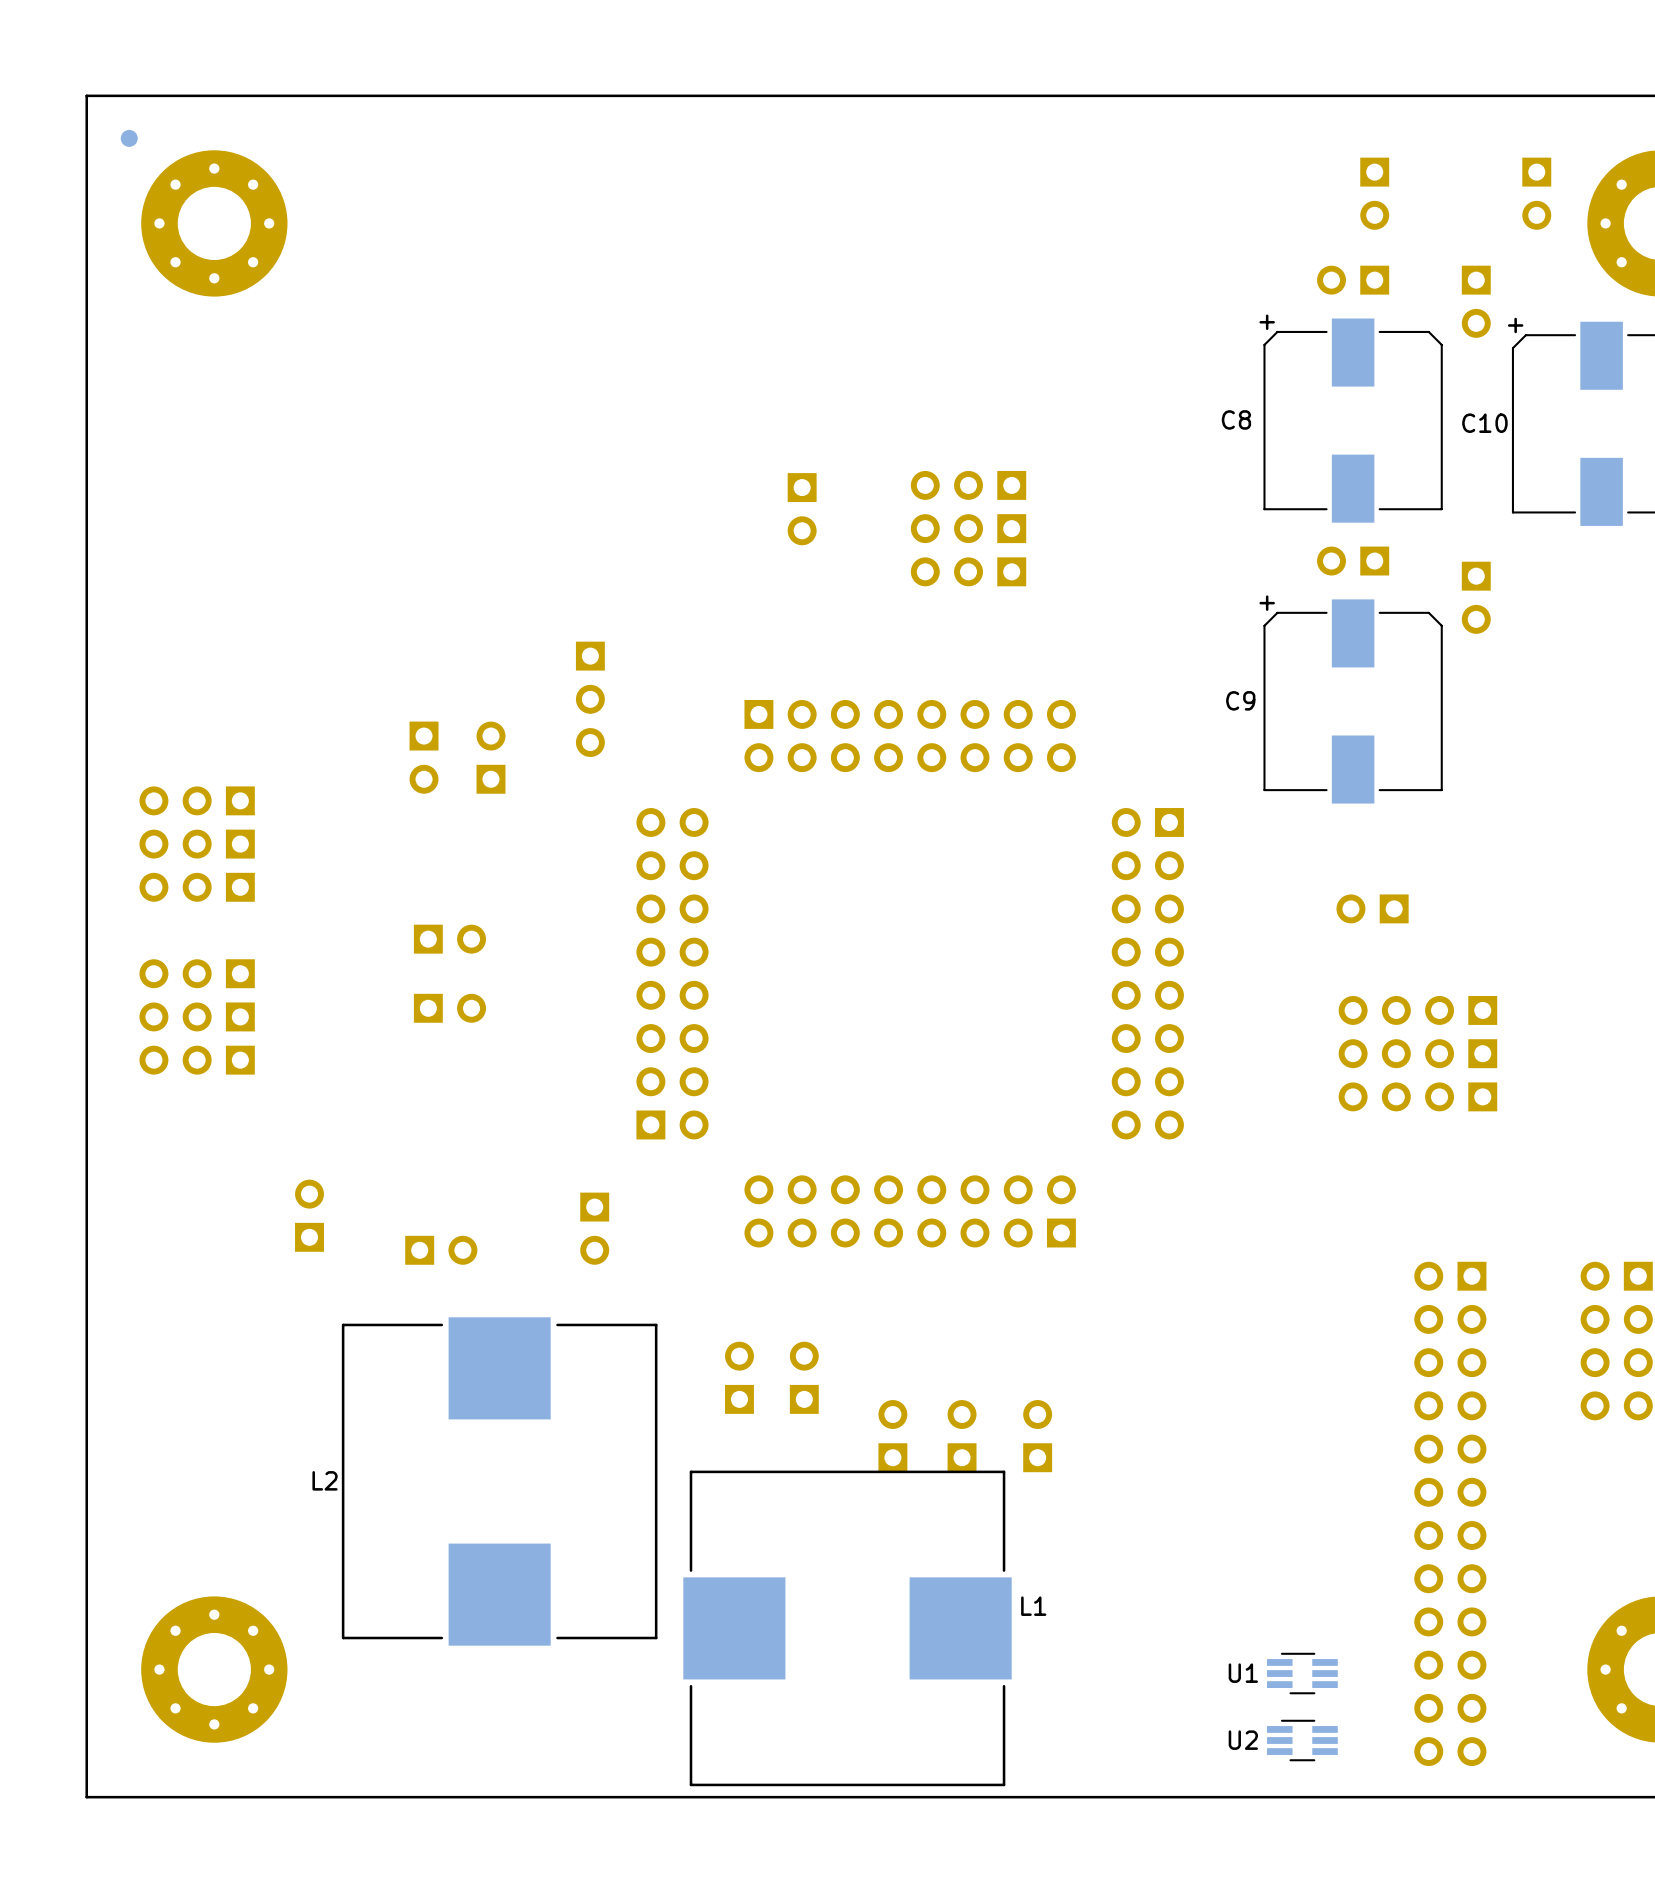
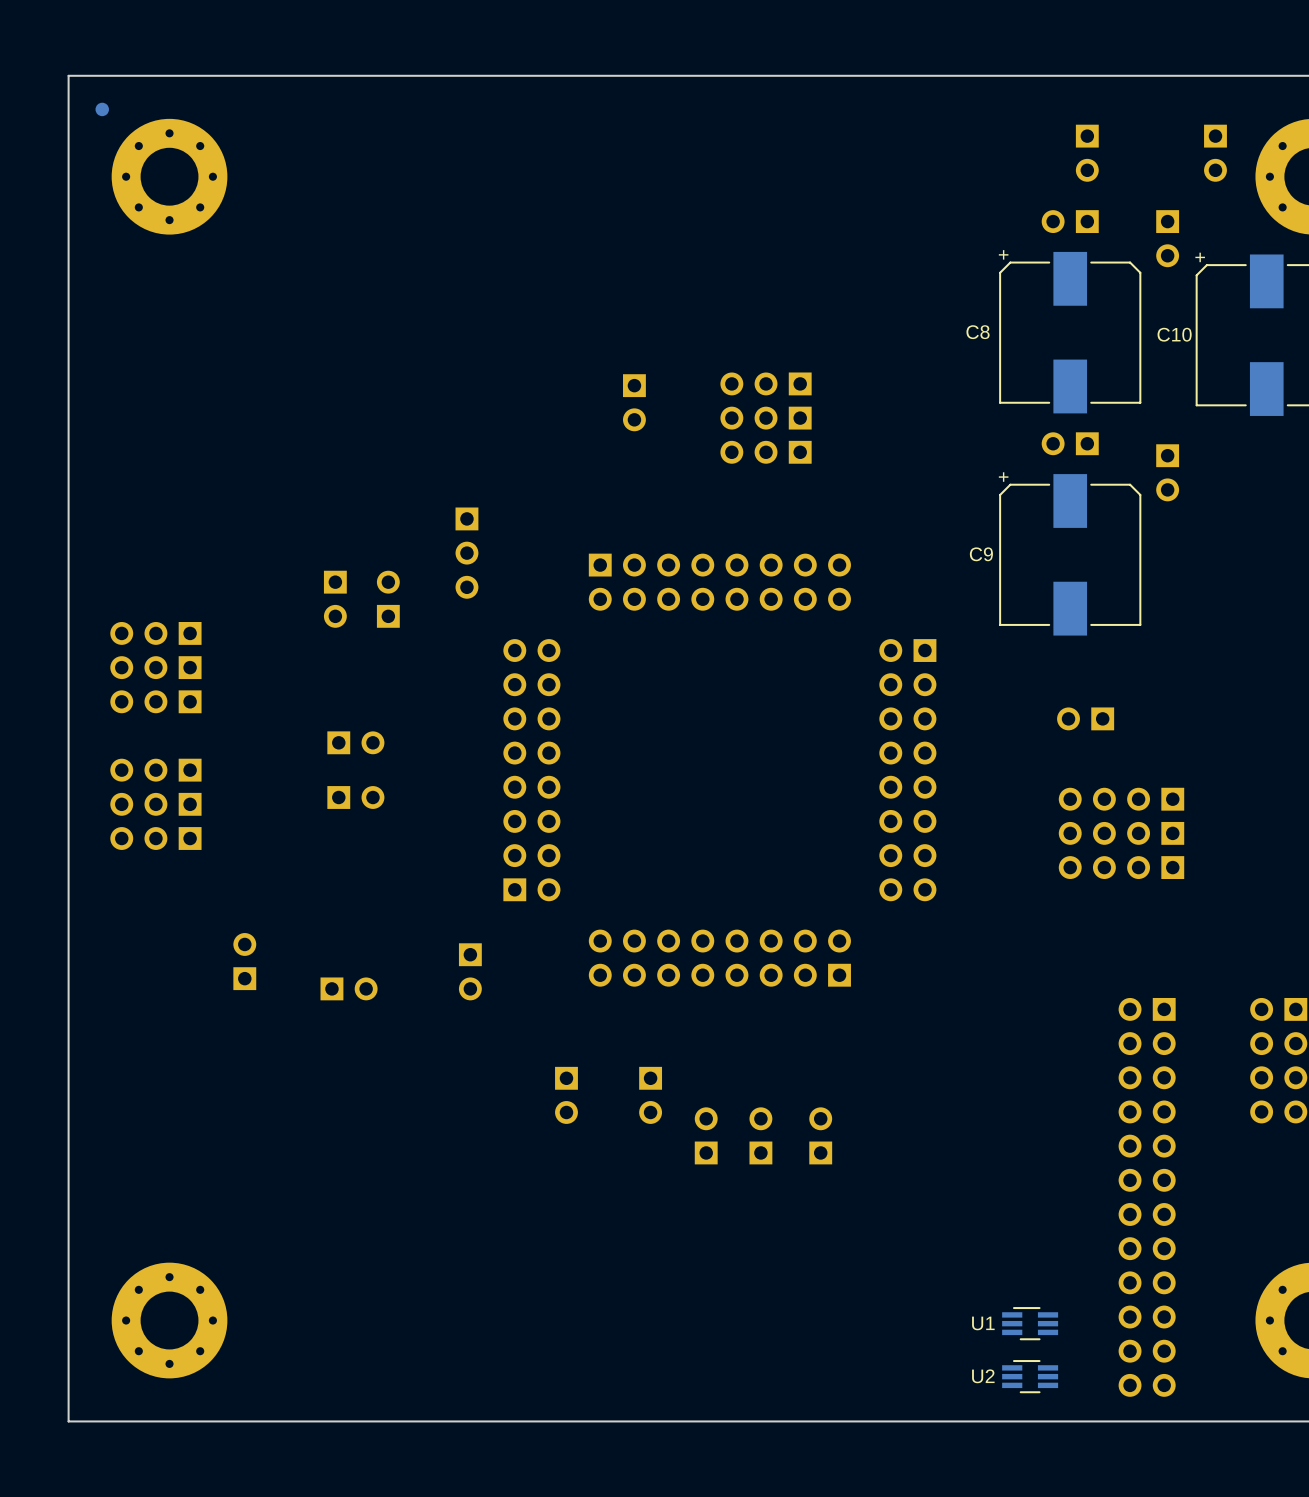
part rotation: 0° (739, 1377) -> 180° (566, 1095)
part rotation: 0° (804, 1377) -> 180° (650, 1095)
L2: (499, 1481) -> none
L1: (847, 1628) -> none

